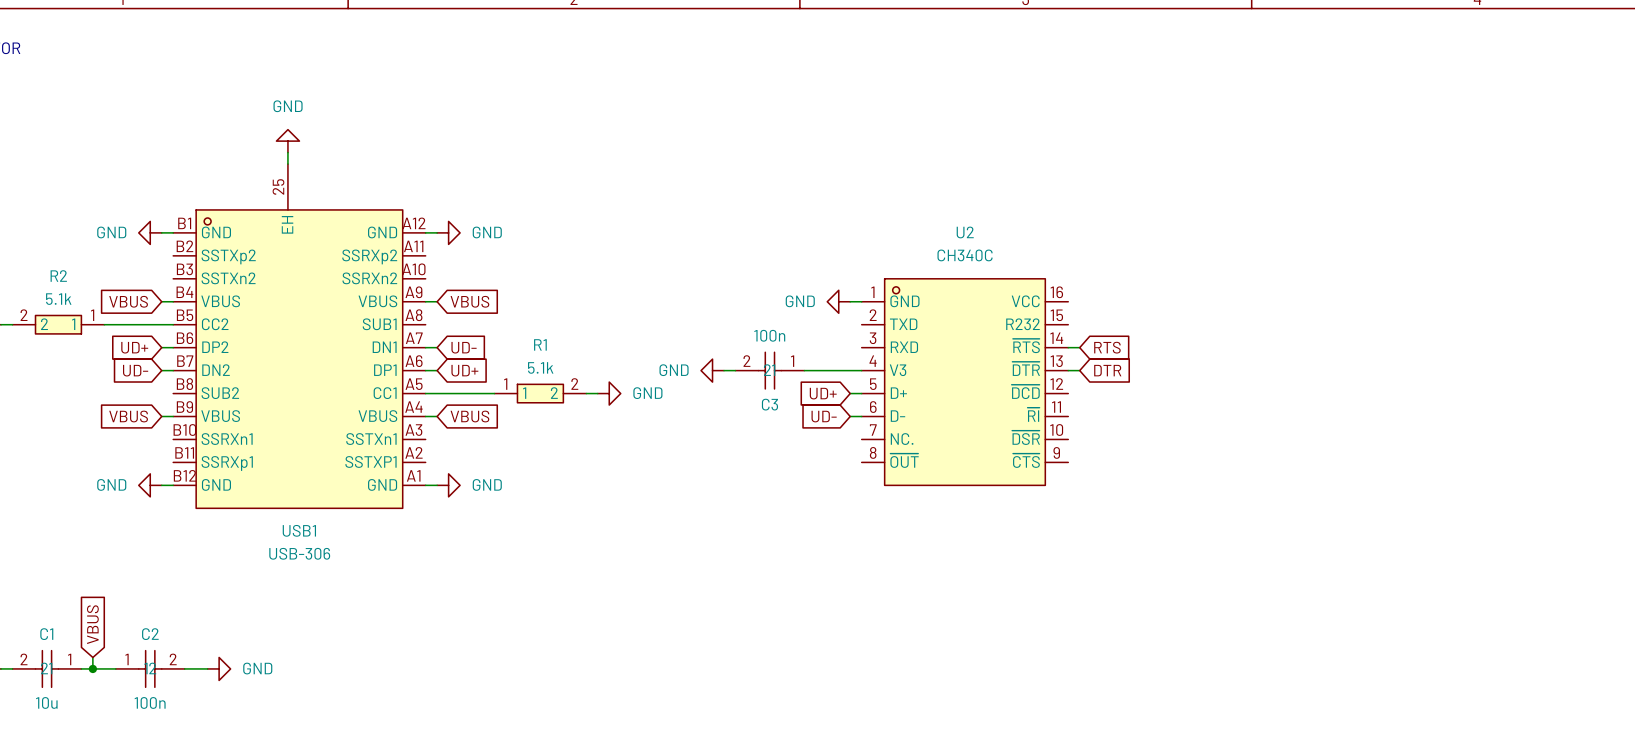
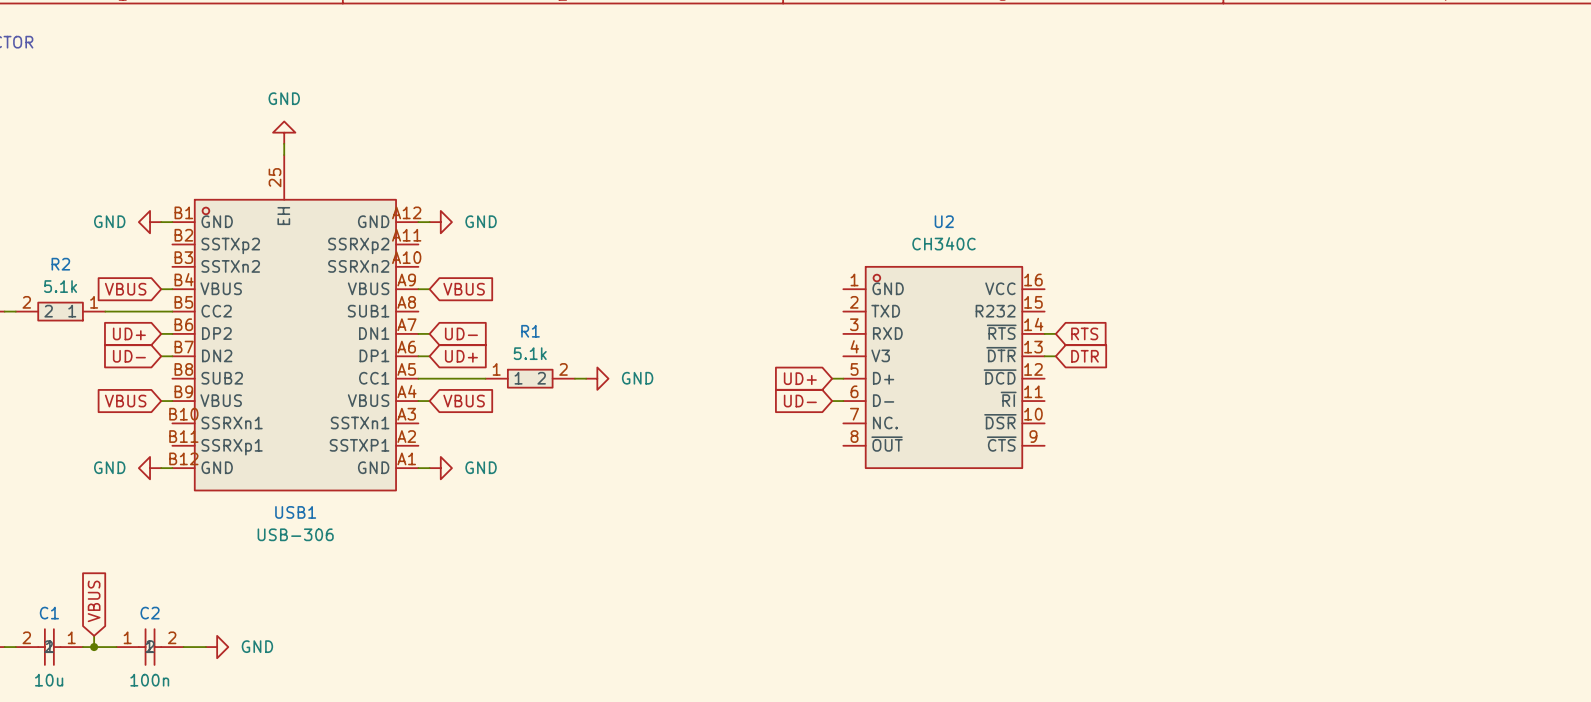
power symbol: GND (838, 301) -> none
wire: (850, 301) (861, 301) -> none
power symbol: GND (712, 370) -> none
wire: (724, 370) (735, 370) -> none
C3: 100n (769, 370) -> none
wire: (804, 370) (861, 370) -> none

